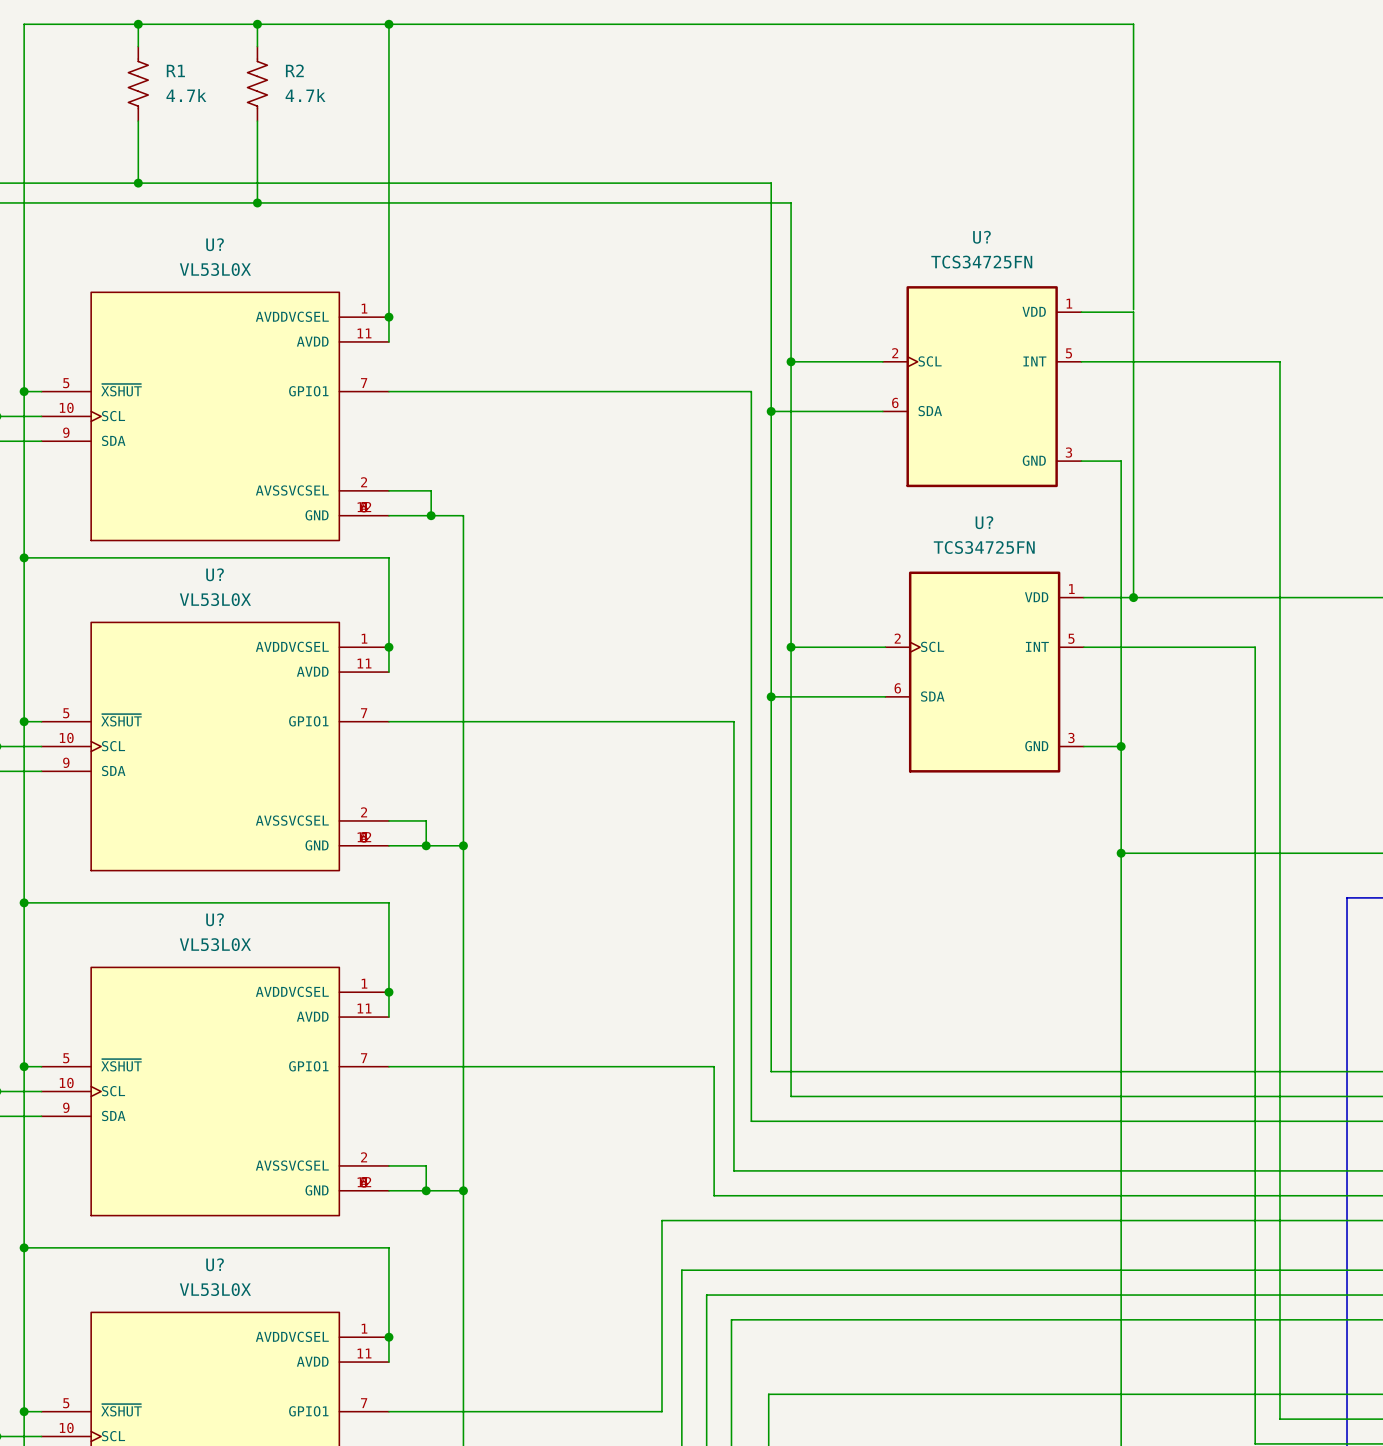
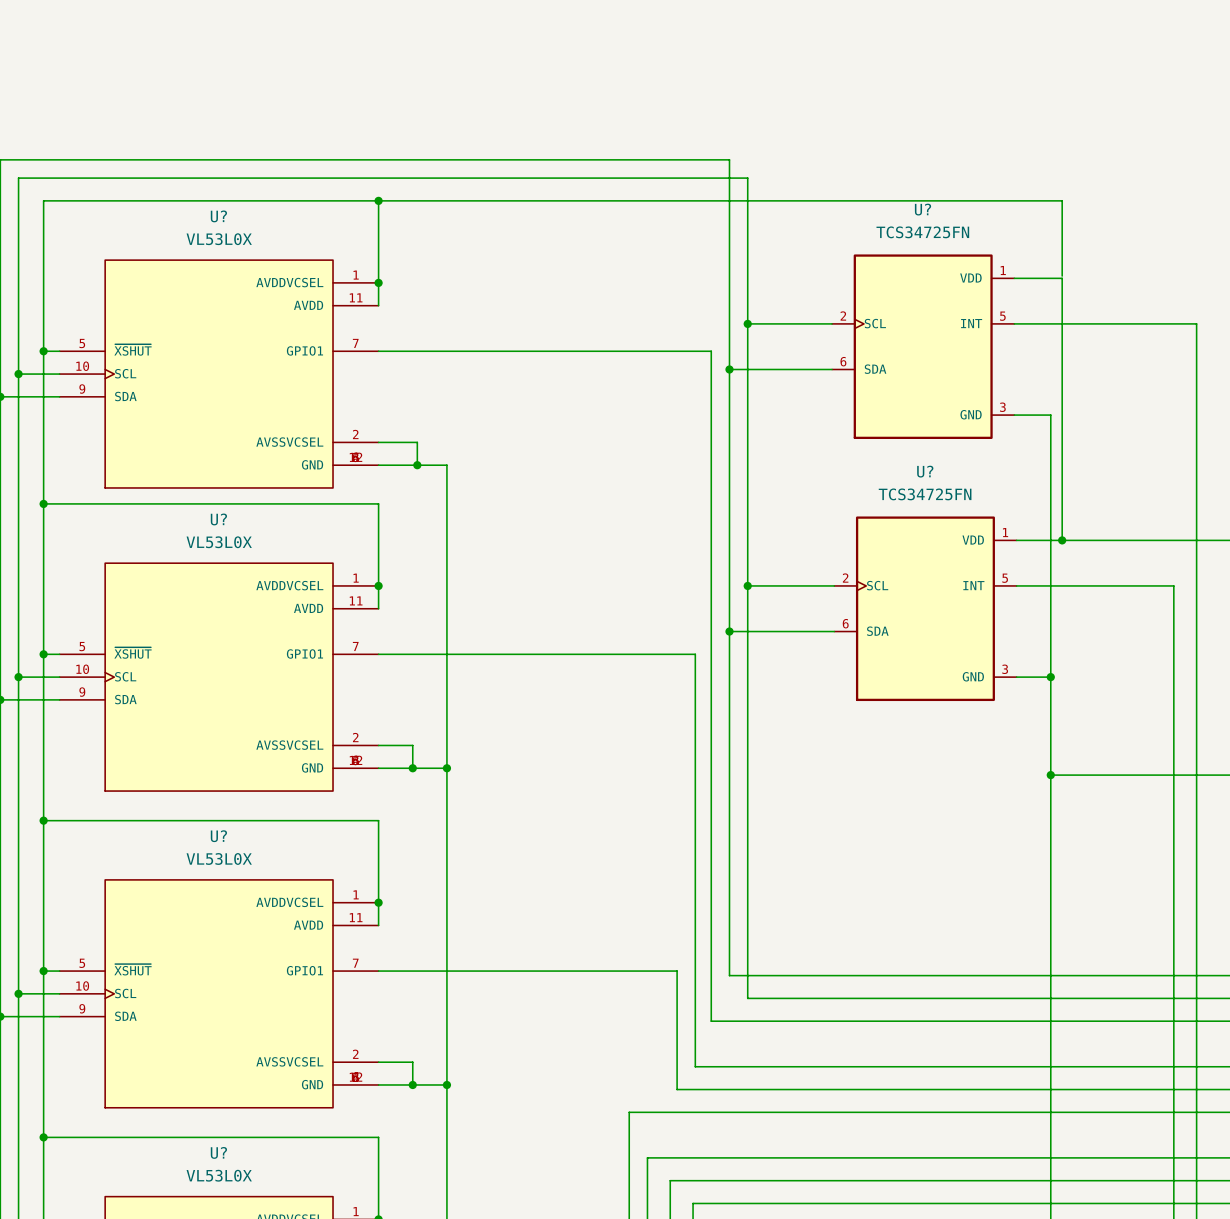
wire: (138, 24) (138, 46) -> none
junction: (138, 24) -> none
wire: (257, 24) (257, 46) -> none
junction: (257, 24) -> none
wire: (388, 24) (388, 227) -> none
junction: (388, 24) -> none
R1: 4.7k (138, 83) -> none
R2: 4.7k (257, 83) -> none
wire: (138, 121) (138, 183) -> none
wire: (257, 121) (257, 202) -> none
junction: (138, 183) -> none
junction: (257, 202) -> none
wire: (24, 227) (24, 24) (1133, 24) (1133, 227) -> (43, 200) (1062, 200)
junction: none -> (378, 200)

